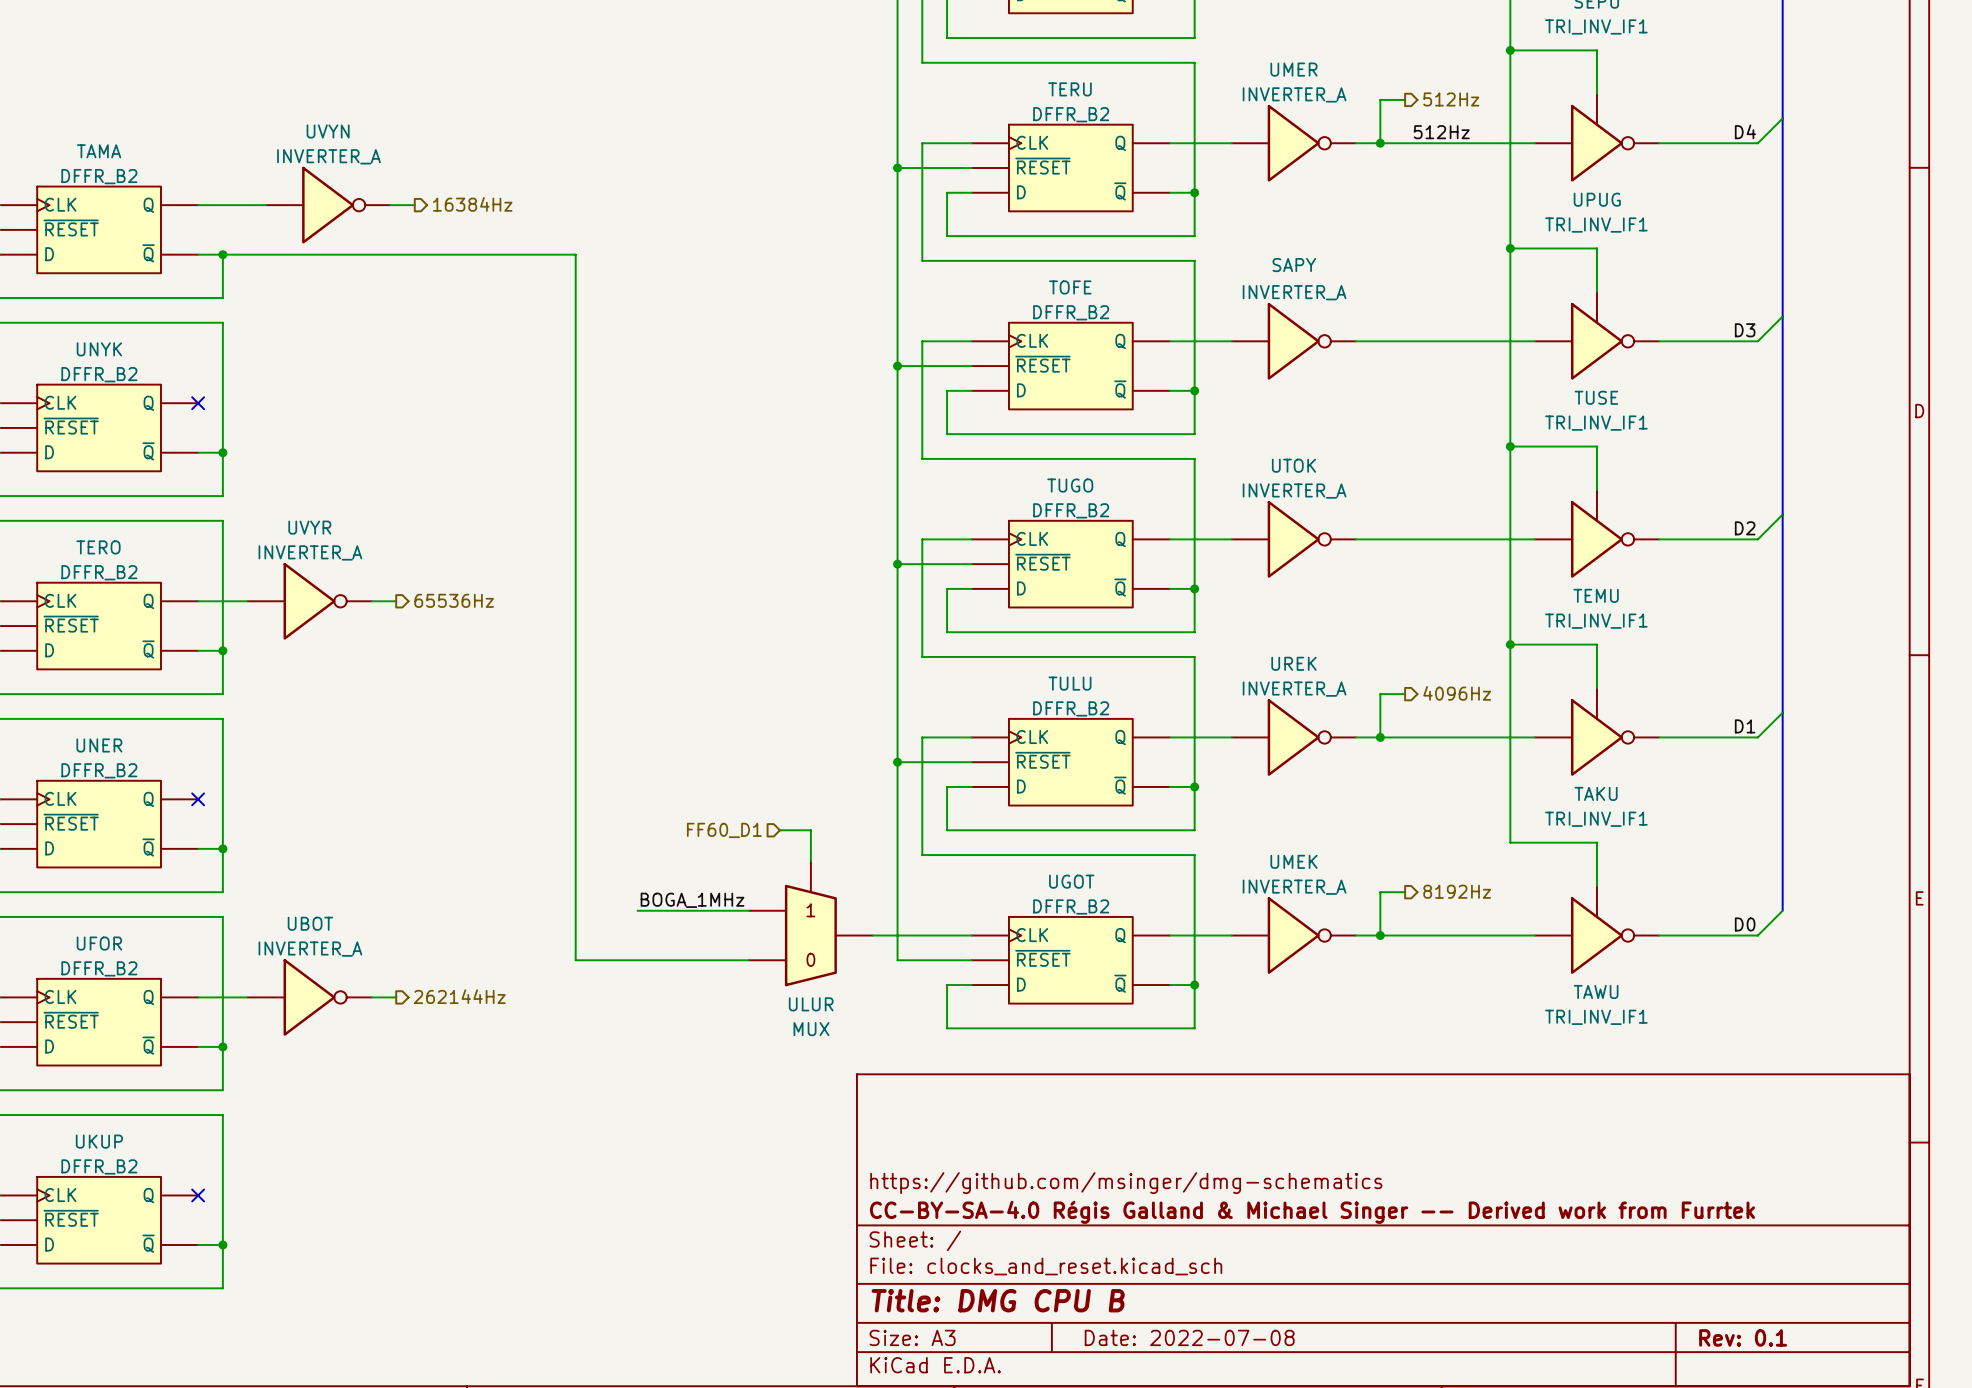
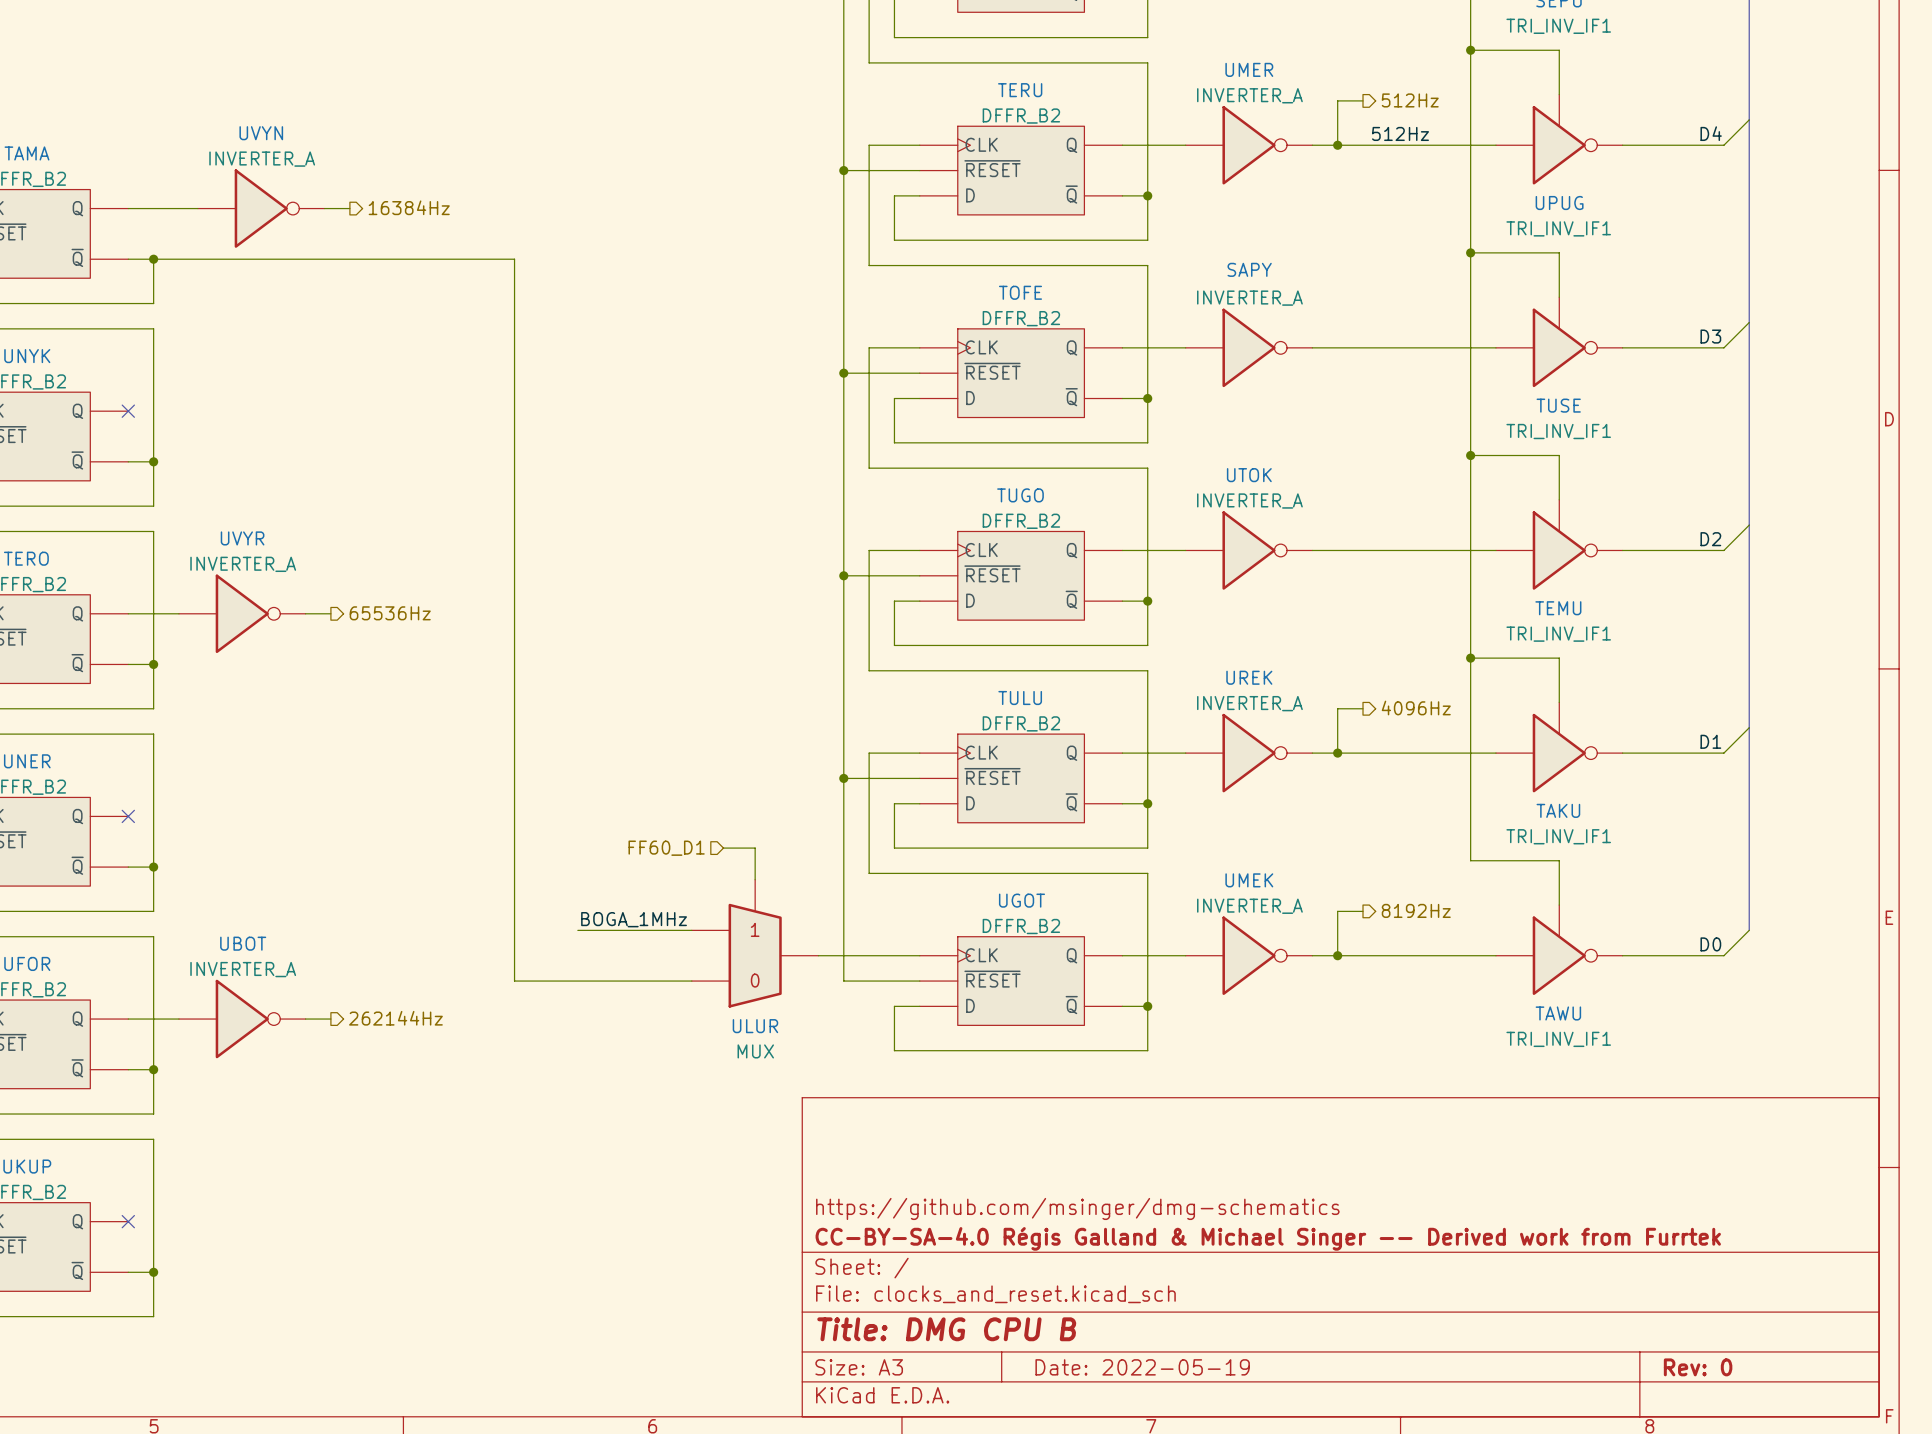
title block: Date: 2022-07-08 (1189, 1337) -> Date: 2022-05-19 (1142, 1367)
title block: Rev: 0.1 (1743, 1337) -> Rev: 0 (1698, 1367)

